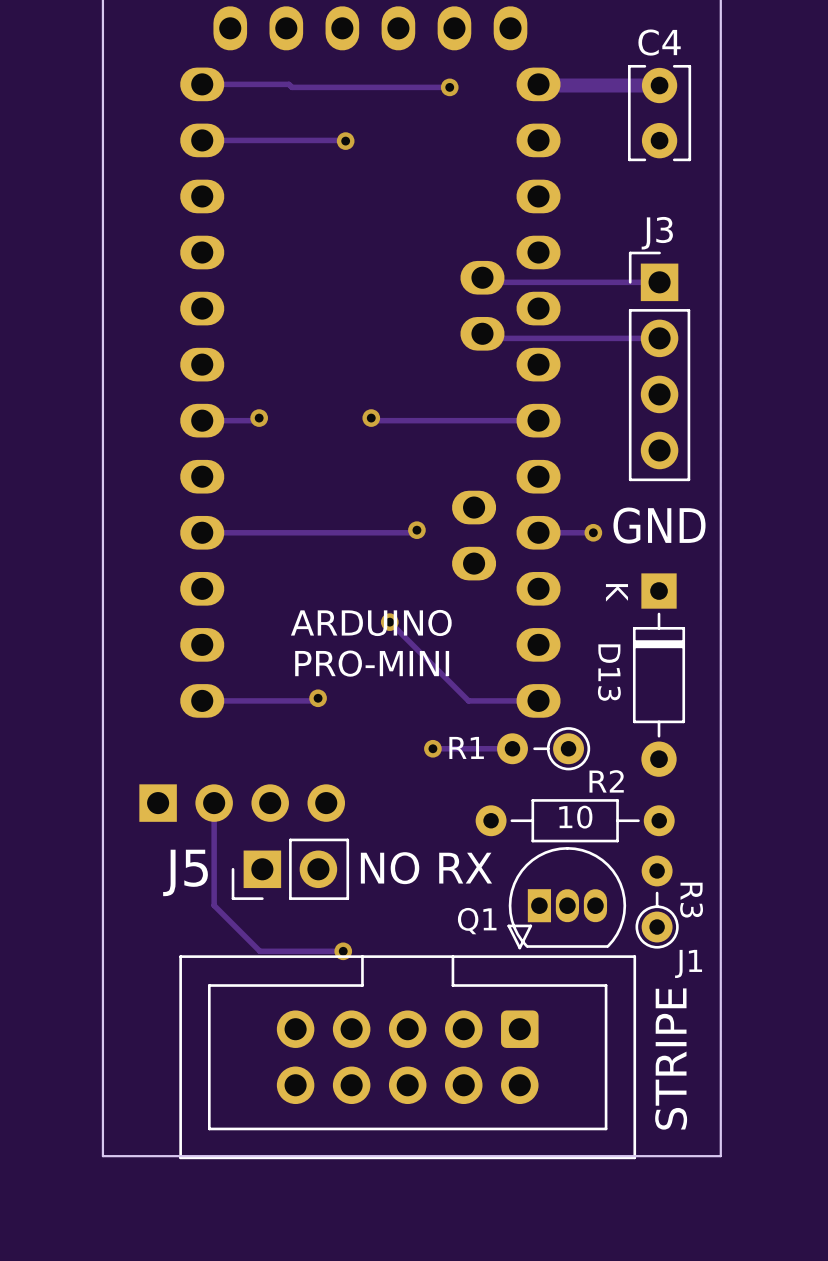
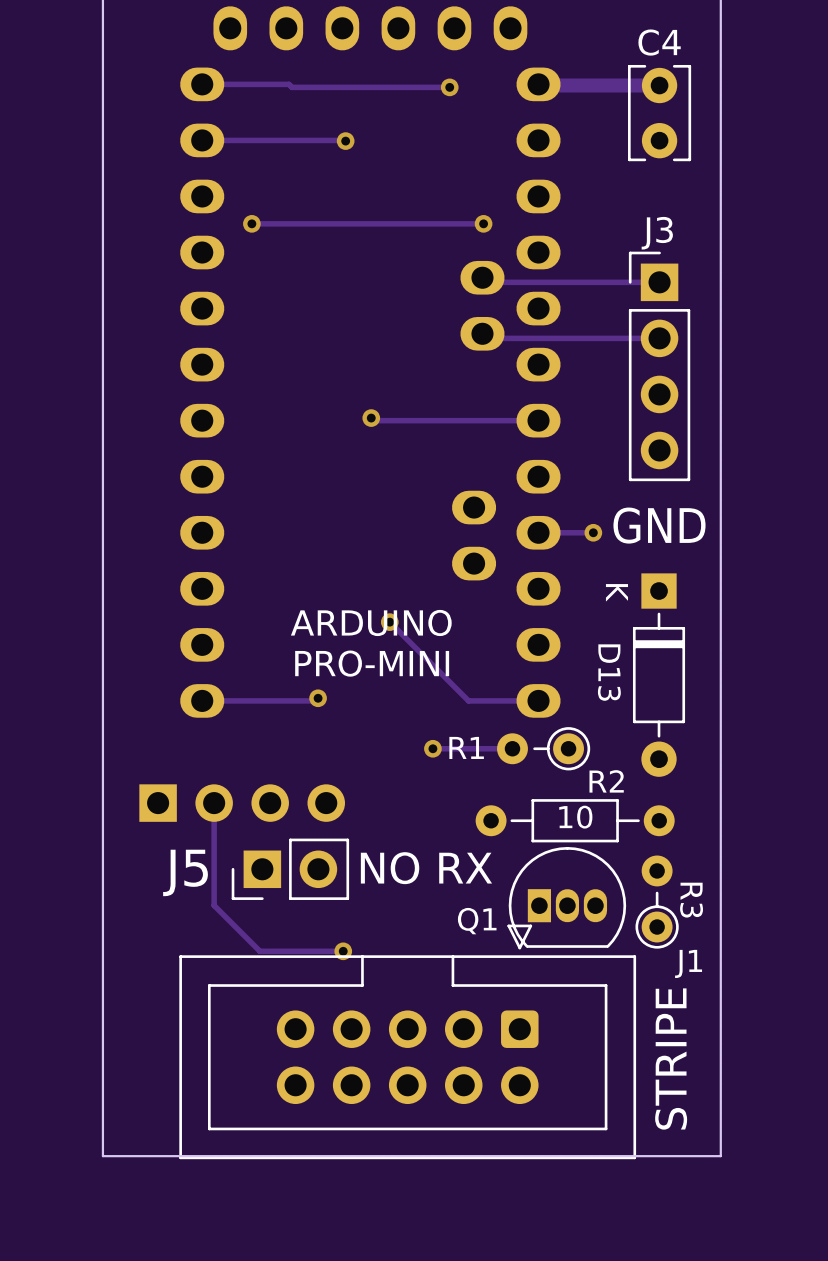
via: none -> (251, 223)
track: none -> (483, 223) (251, 223)
via: none -> (483, 223)
track: (259, 418) (256, 420) (202, 420) -> none
via: (259, 418) -> none
track: (416, 530) (414, 532) (202, 532) -> none
via: (416, 530) -> none

